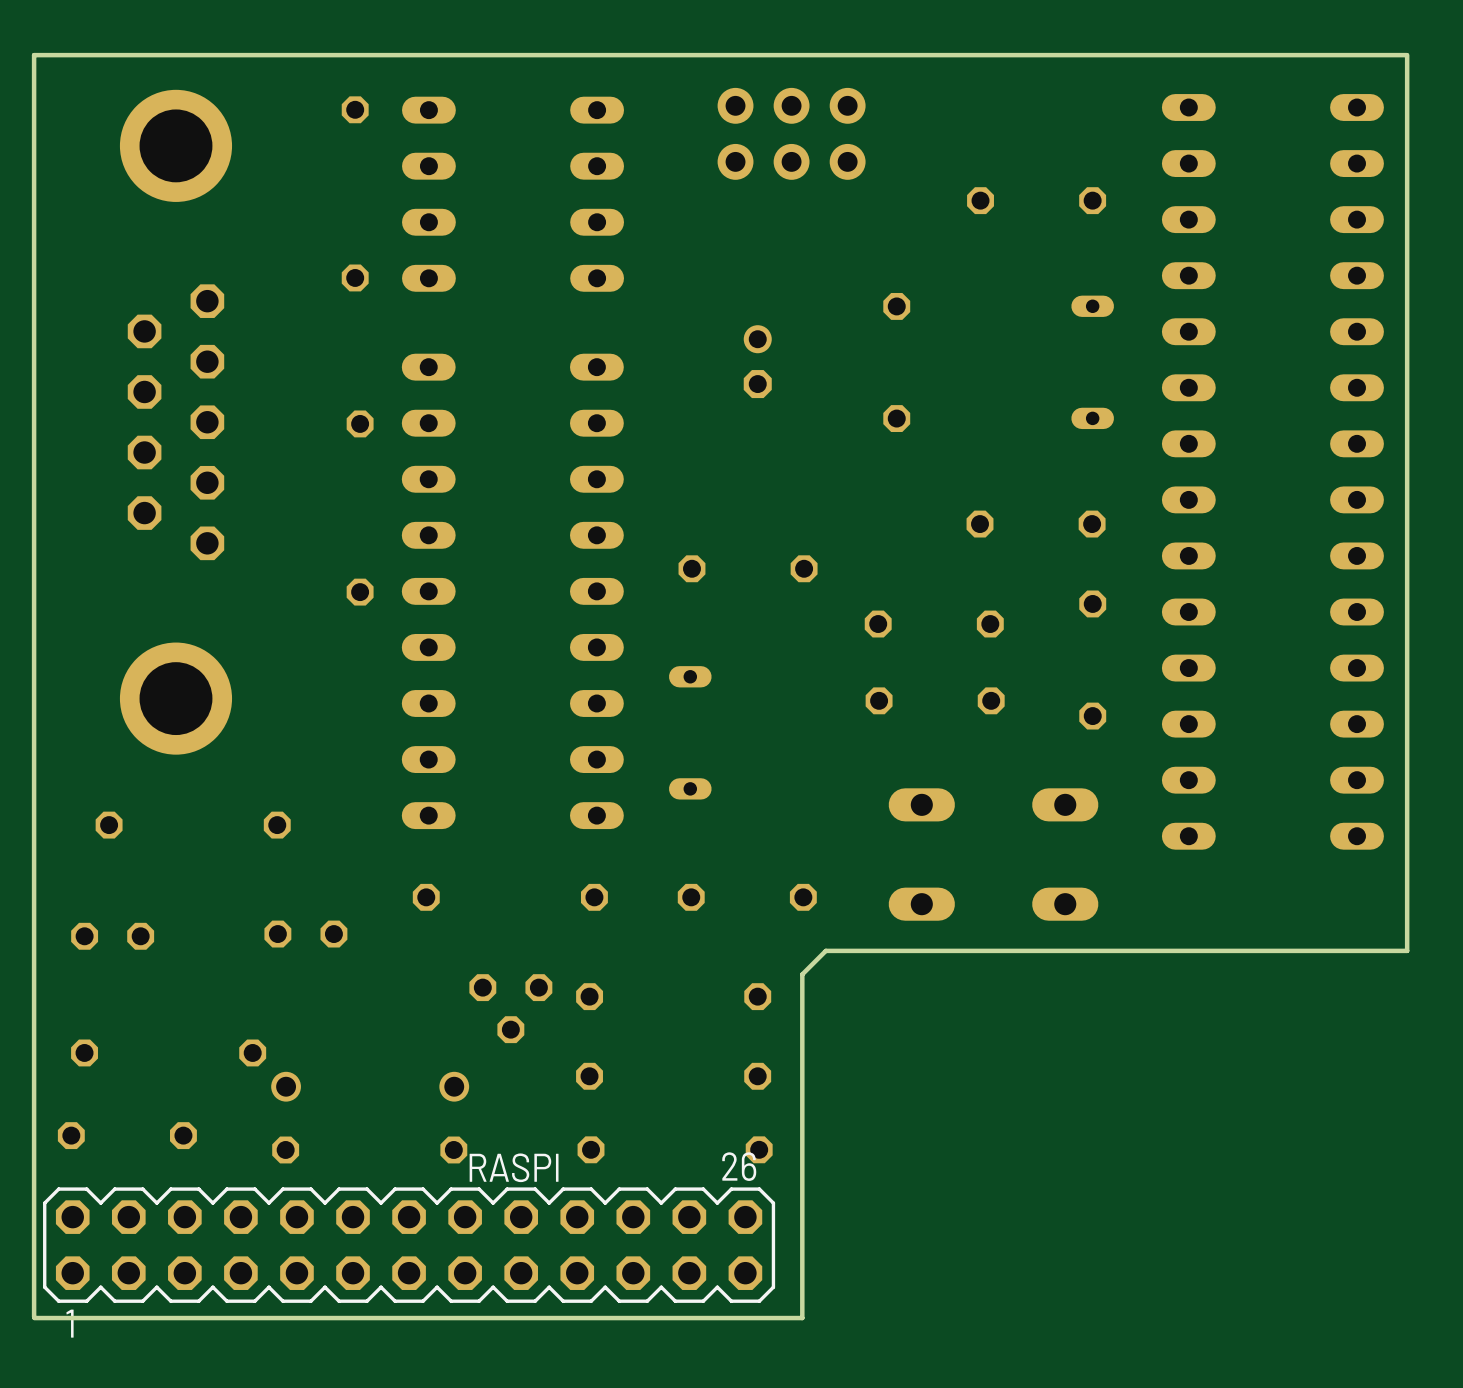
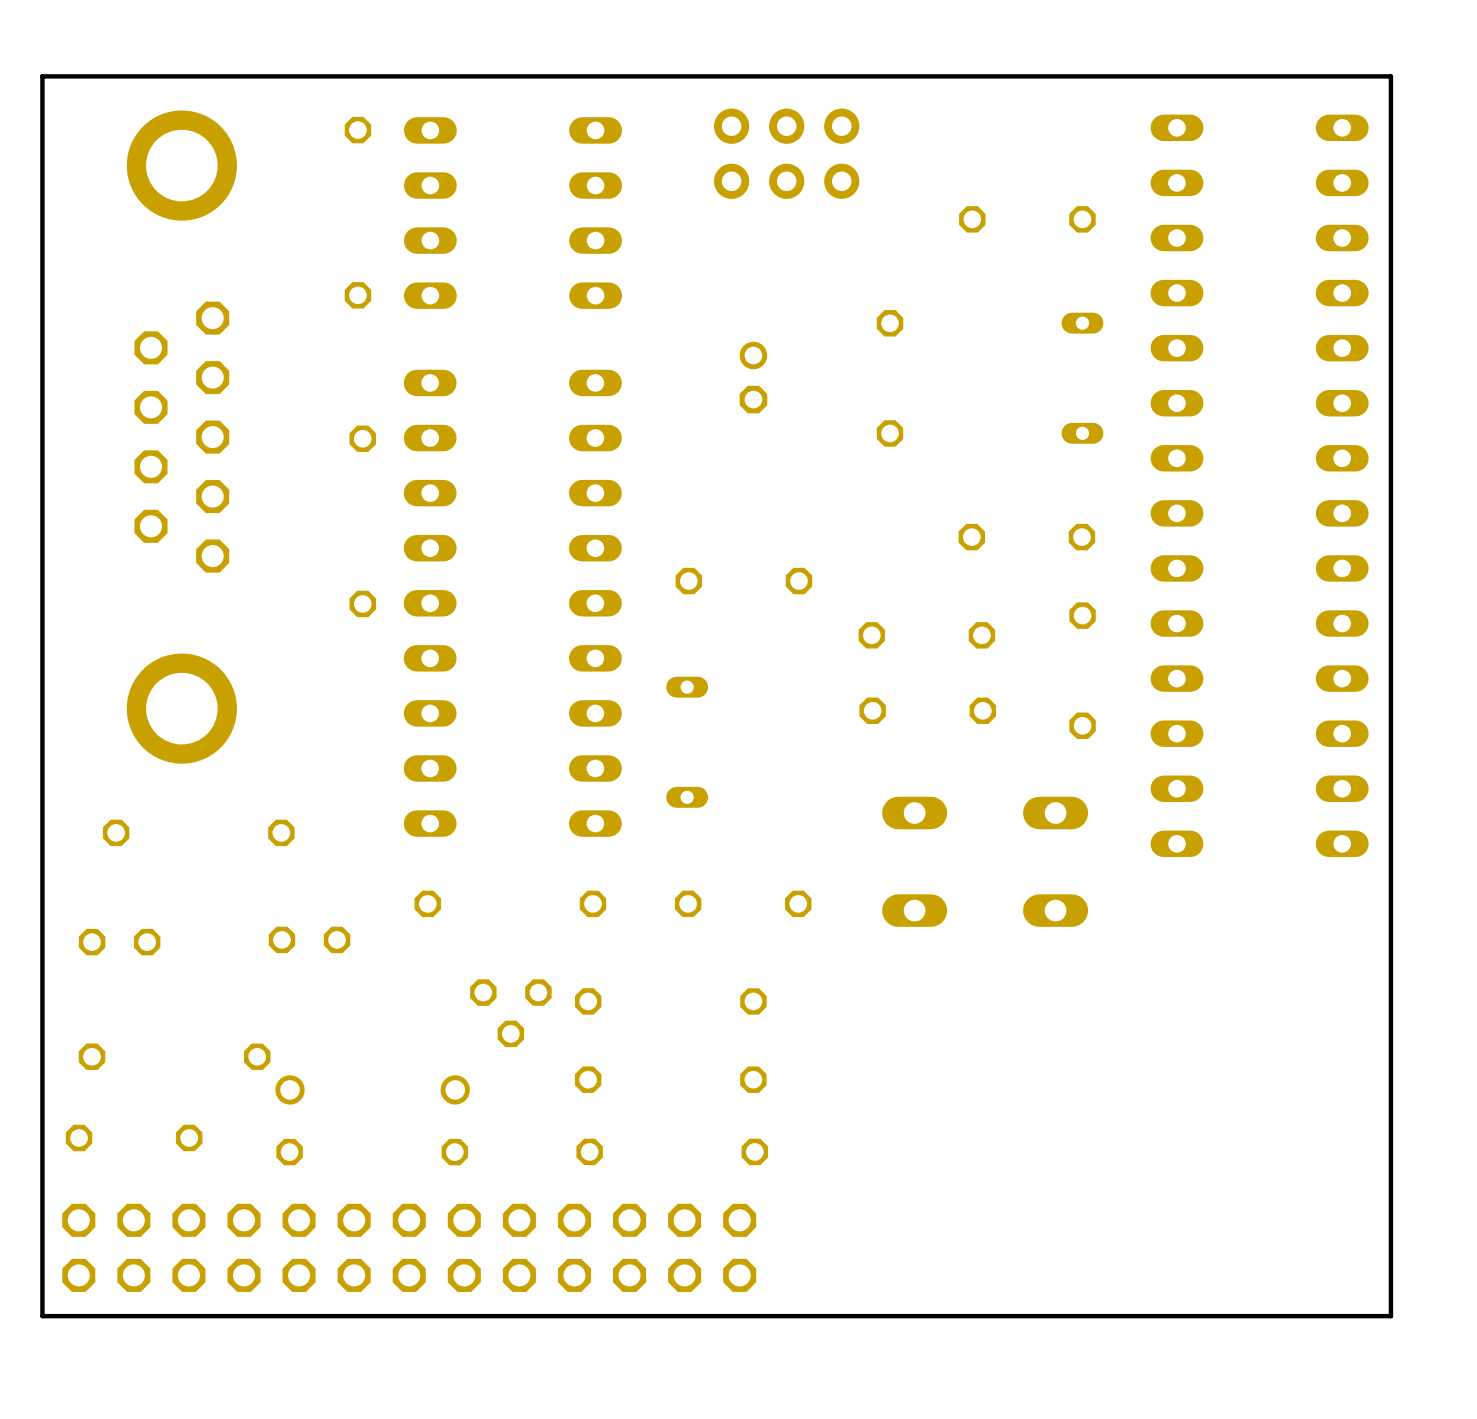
board edge: (1407, 55) (1407, 950) (825, 950) (802, 974) (802, 1318) (34, 1318) -> (1390, 76) (1390, 1316) (42, 1316)
RASPI: (409, 1245) -> none
part: none -> (409, 1247)

